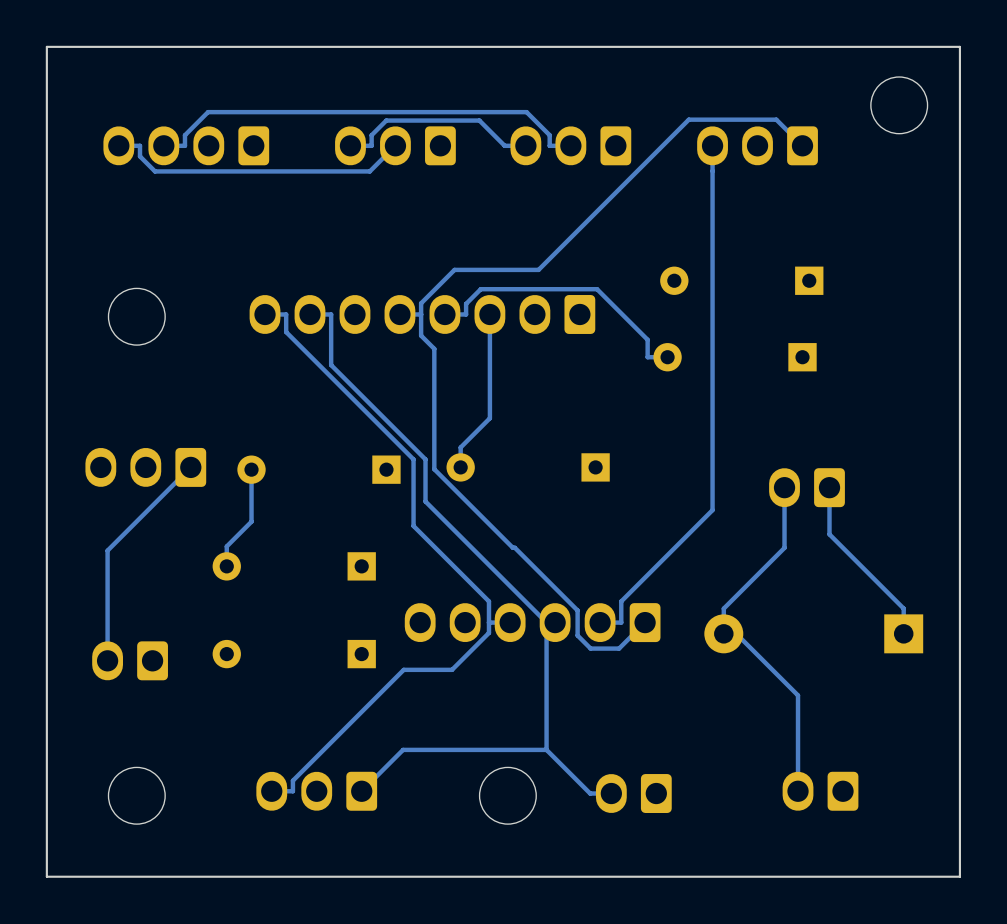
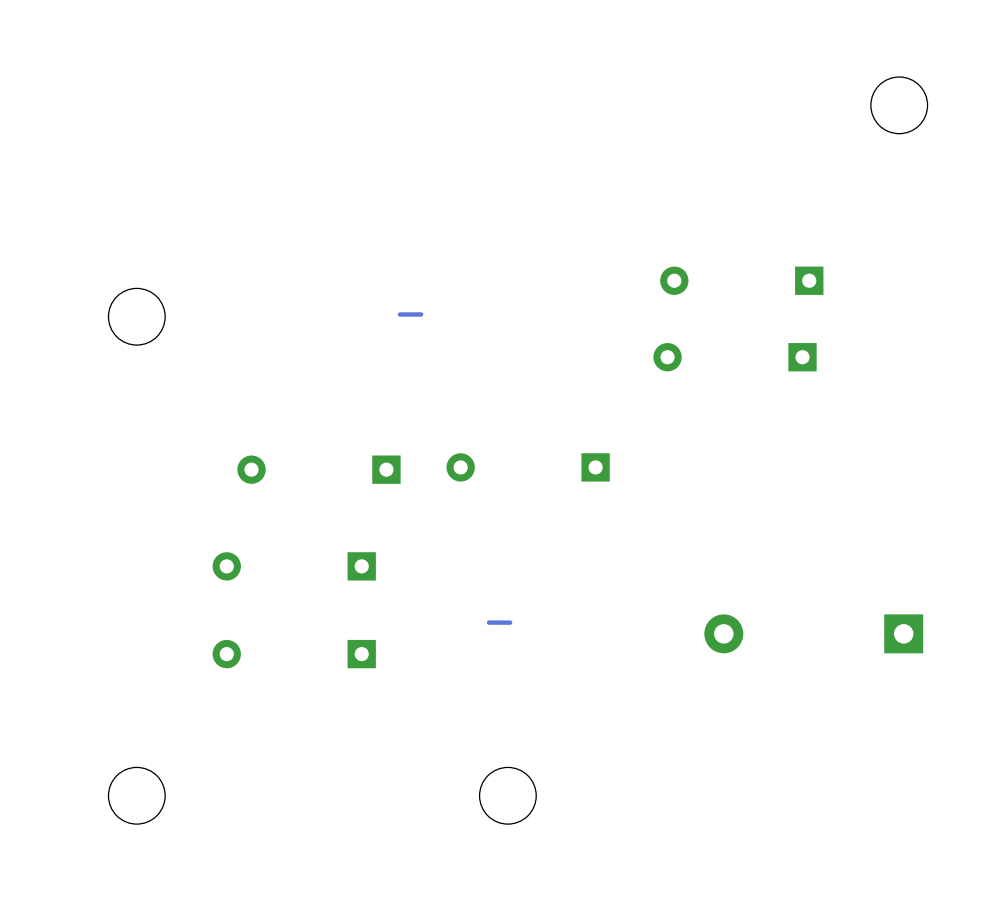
board edge: (959, 46) (959, 876) (46, 876) (46, 46) (959, 46) -> none
part: (186, 145) -> none
track: (395, 145) (369, 171) (155, 171) (140, 156) (140, 145) (118, 145) -> none
part: (395, 145) -> none
track: (525, 145) (504, 145) (479, 120) (386, 120) (371, 135) (371, 145) (350, 145) -> none
track: (570, 145) (549, 145) (549, 135) (526, 112) (208, 112) (184, 135) (184, 145) (163, 145) -> none
part: (570, 145) -> none
track: (712, 145) (712, 510) (621, 601) (621, 622) (600, 622) -> none
part: (757, 145) -> none
track: (802, 145) (776, 119) (688, 119) (538, 269) (454, 269) (421, 303) (421, 335) (434, 348) (434, 469) (577, 610) (577, 635) (590, 648) (619, 648) (645, 622) -> none
track: (265, 314) (286, 314) (286, 332) (413, 459) (413, 525) (488, 601) (488, 632) (452, 669) (403, 669) (292, 780) (292, 791) (271, 791) -> none
track: (309, 314) (331, 314) (331, 365) (425, 459) (425, 501) (546, 622) -> none
part: (422, 314) -> none
track: (444, 314) (466, 314) (466, 303) (480, 289) (597, 289) (647, 339) (647, 357) (667, 357) -> none
track: (489, 314) (489, 418) (460, 447) (460, 467) -> none
part: (145, 467) -> none
track: (190, 467) (107, 550) (107, 660) -> none
track: (251, 469) (251, 521) (226, 546) (226, 566) -> none
track: (784, 487) (784, 547) (723, 608) (723, 633) -> none
part: (807, 487) -> none
track: (829, 487) (829, 534) (903, 608) (903, 633) -> none
track: (723, 621) (798, 695) (798, 791) -> none
part: (532, 622) -> none
track: (546, 622) (546, 749) -> none
part: (130, 660) -> none
track: (546, 749) (590, 793) (611, 793) -> none
track: (546, 749) (403, 749) (361, 791) -> none
part: (316, 791) -> none
part: (820, 791) -> none
part: (633, 793) -> none

